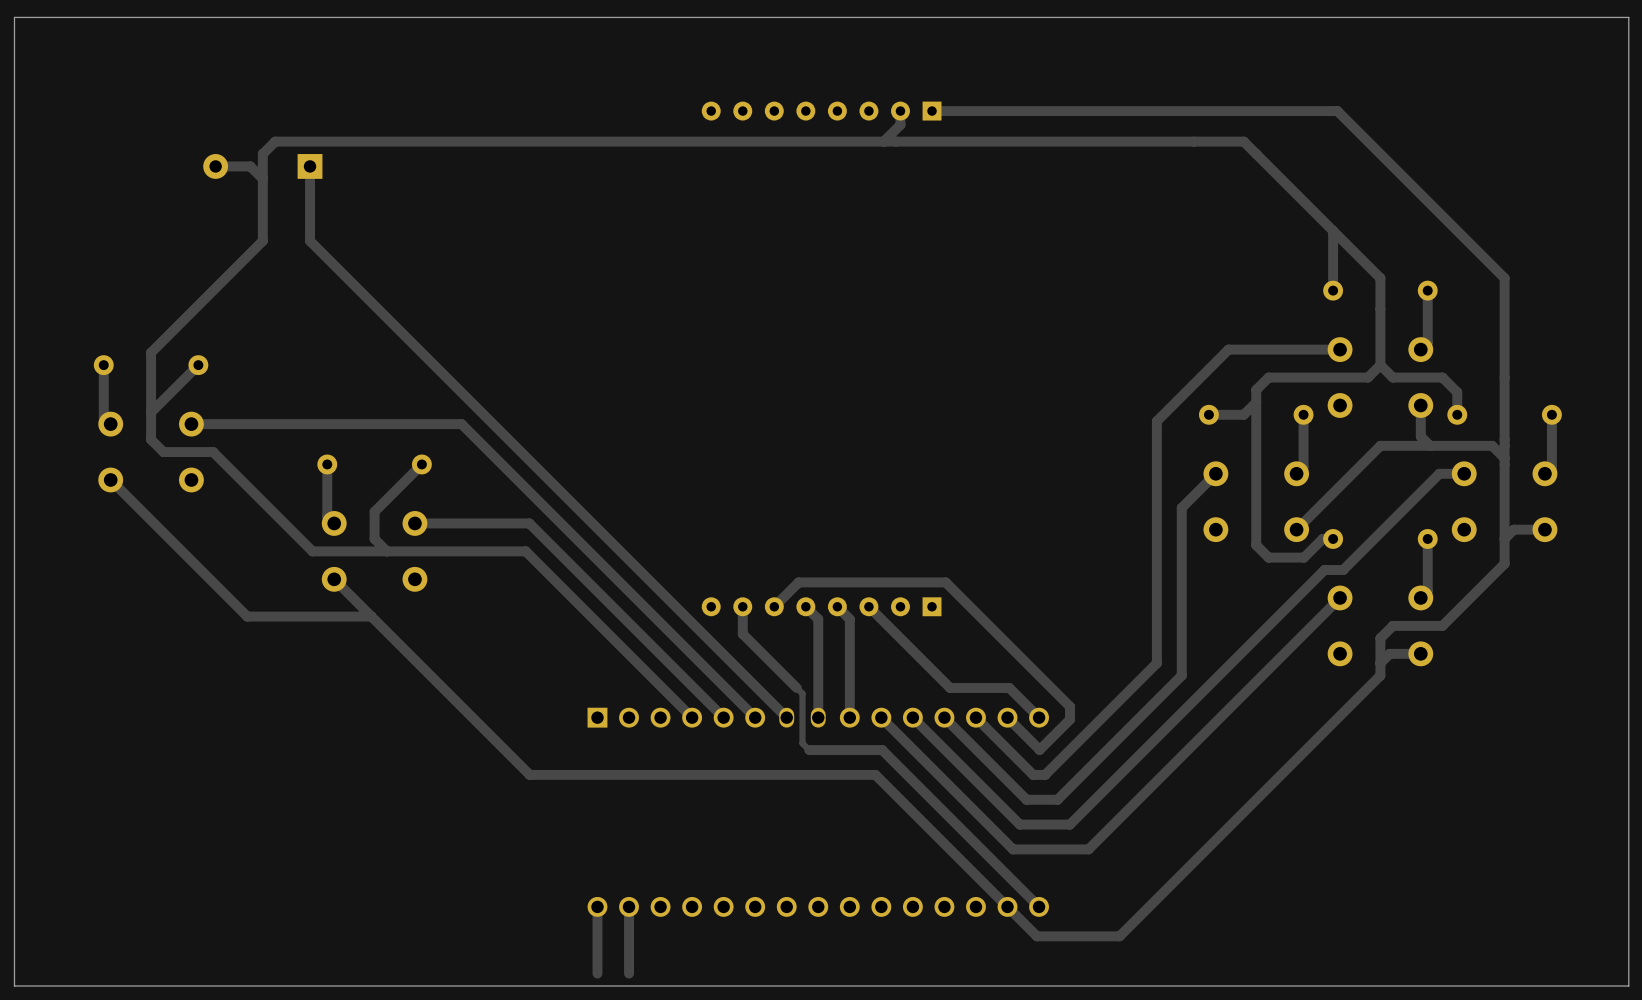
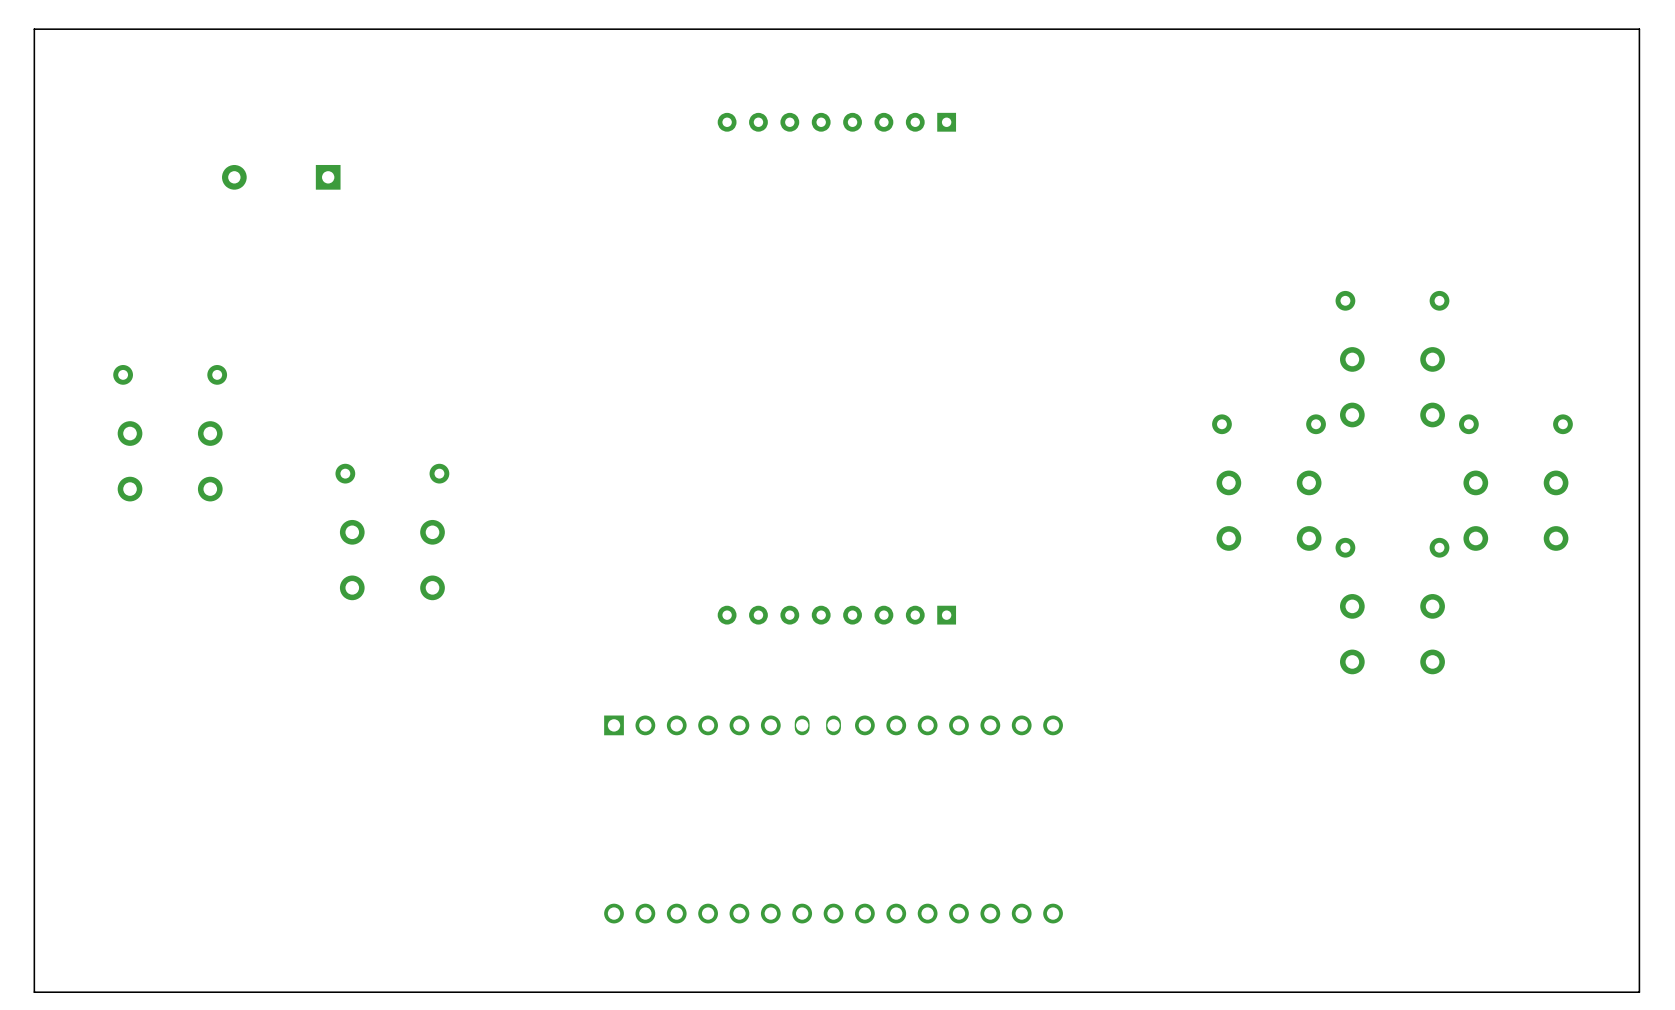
track: (900, 111) (900, 124) (883, 141) -> none
track: (932, 111) (1337, 111) (1504, 278) (1504, 563) (1442, 625) (1392, 625) (1380, 638) (1380, 675) (1119, 936) (1036, 936) (875, 774) (529, 774) (334, 579) -> none
track: (215, 166) (250, 166) (262, 178) -> none
track: (310, 166) (310, 240) (786, 717) -> none
track: (1333, 230) (1333, 290) -> none
track: (1427, 290) (1427, 342) (1420, 349) -> none
track: (1340, 349) (1228, 349) (1156, 421) (1156, 663) (1045, 774) (1033, 774) (975, 717) -> none
track: (103, 365) (103, 417) (110, 424) -> none
track: (198, 365) (151, 412) -> none
track: (1380, 365) (1368, 377) (1268, 377) (1256, 389) (1256, 545) (1268, 557) (1303, 557) (1322, 538) (1333, 538) -> none
track: (1380, 365) (1392, 377) (1442, 377) (1457, 392) (1457, 414) -> none
track: (1380, 365) (1380, 278) (1243, 141) (275, 141) (262, 154) (262, 240) (151, 352) (151, 439) (163, 452) (213, 452) (312, 551) (525, 551) (692, 717) -> none
track: (1256, 402) (1243, 414) (1208, 414) -> none
track: (1420, 405) (1420, 436) (1430, 445) -> none
track: (1303, 414) (1303, 466) (1296, 473) -> none
track: (1551, 414) (1551, 466) (1544, 473) -> none
track: (191, 424) (461, 424) (755, 717) -> none
track: (1504, 458) (1492, 445) (1380, 445) (1296, 529) (1299, 532) -> none
track: (327, 464) (327, 516) (334, 523) -> none
track: (421, 464) (374, 511) (374, 538) (387, 551) -> none
track: (1215, 473) (1181, 507) (1181, 675) (1057, 799) (1026, 799) (944, 717) -> none
track: (1464, 473) (1439, 473) (1343, 570) (1324, 570) (1069, 824) (1019, 824) (912, 717) -> none
track: (110, 479) (247, 616) (371, 616) -> none
track: (414, 523) (529, 523) (723, 717) (723, 714) -> none
track: (1544, 529) (1513, 529) (1504, 538) -> none
track: (1427, 538) (1427, 591) (1420, 597) -> none
track: (1340, 597) (1088, 849) (1013, 849) (881, 717) -> none
track: (742, 606) (742, 633) (802, 693) (802, 743) (809, 750) (882, 750) (1039, 906) -> none
track: (774, 606) (798, 582) (945, 582) (1069, 706) (1069, 719) (1039, 749) (1007, 717) -> none
track: (805, 606) (818, 619) (818, 717) -> none
track: (837, 606) (849, 619) (849, 717) -> none
track: (868, 606) (950, 687) (1009, 687) (1039, 717) -> none
track: (1420, 653) (1389, 653) (1380, 663) -> none
track: (597, 906) (597, 973) -> none
track: (629, 906) (629, 973) -> none

